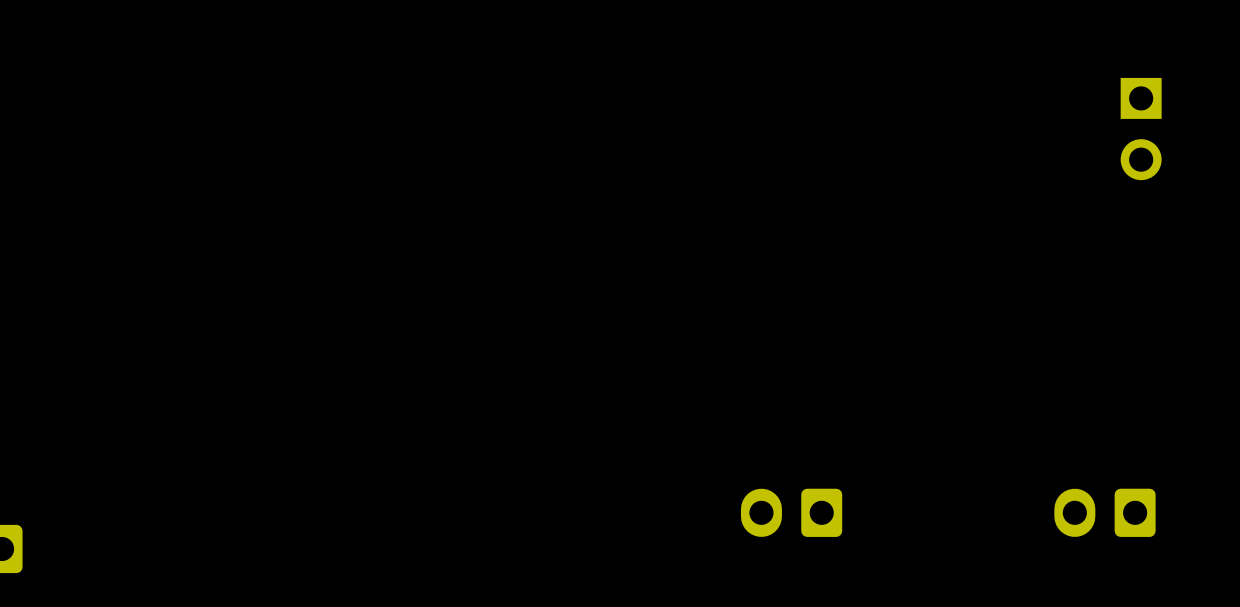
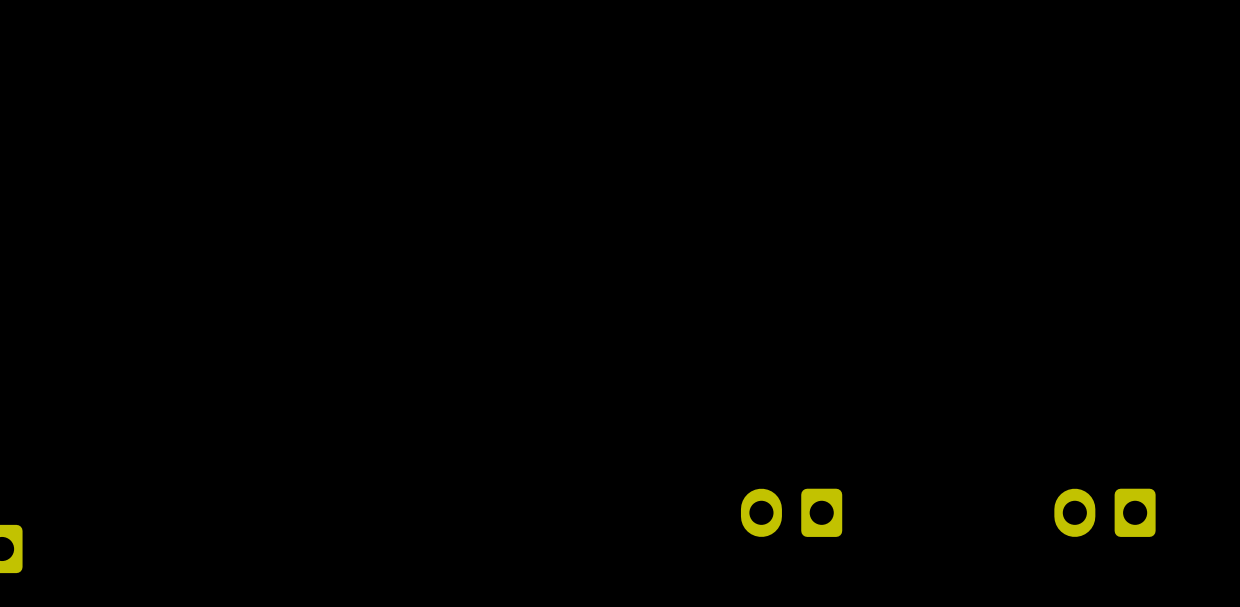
part: (1141, 129) -> none

